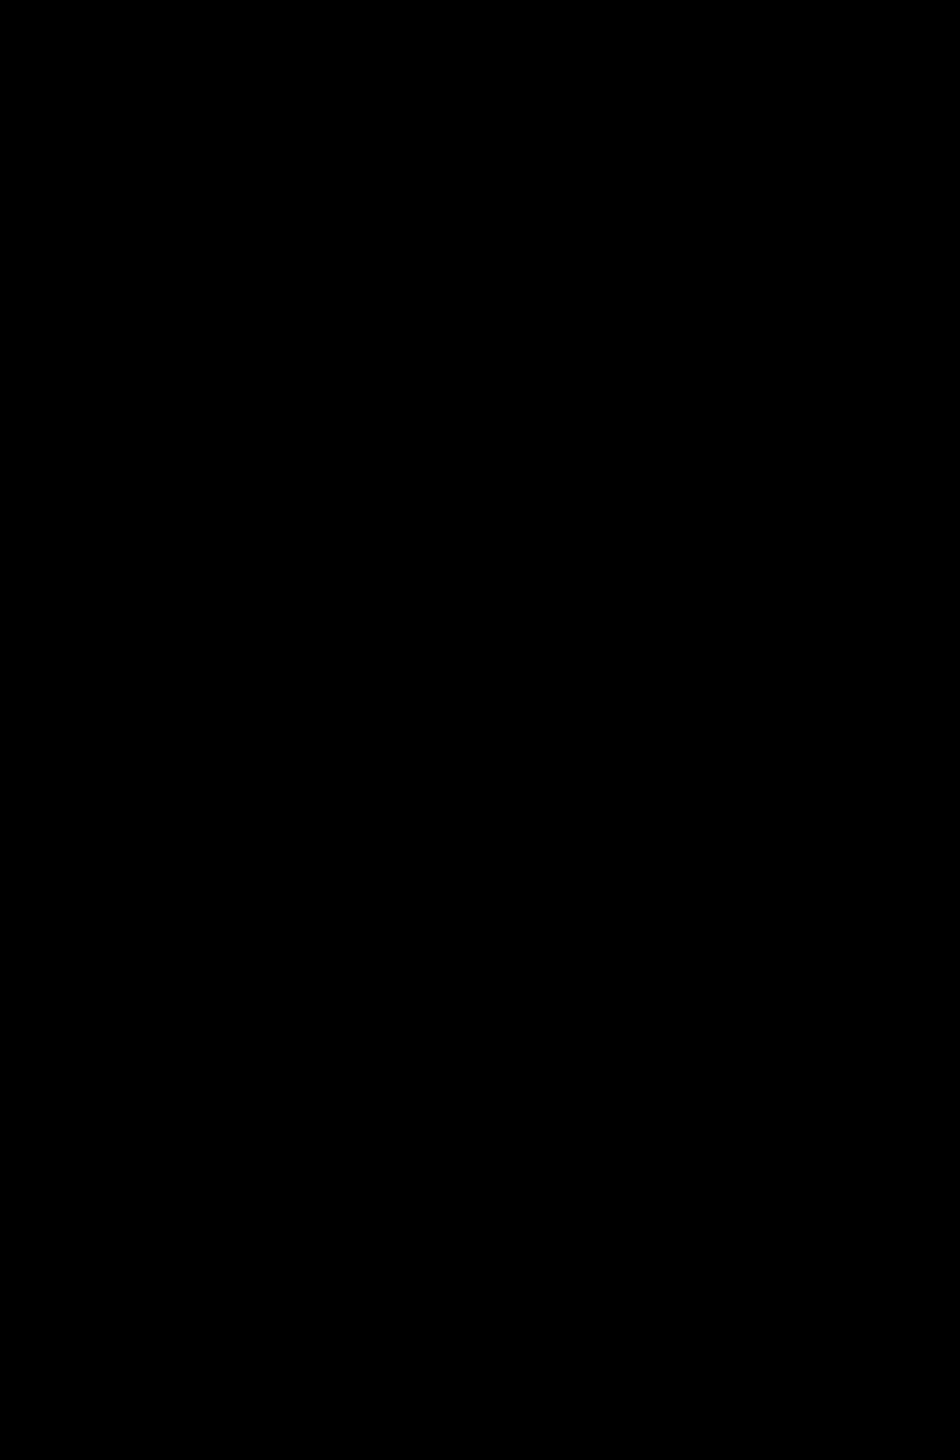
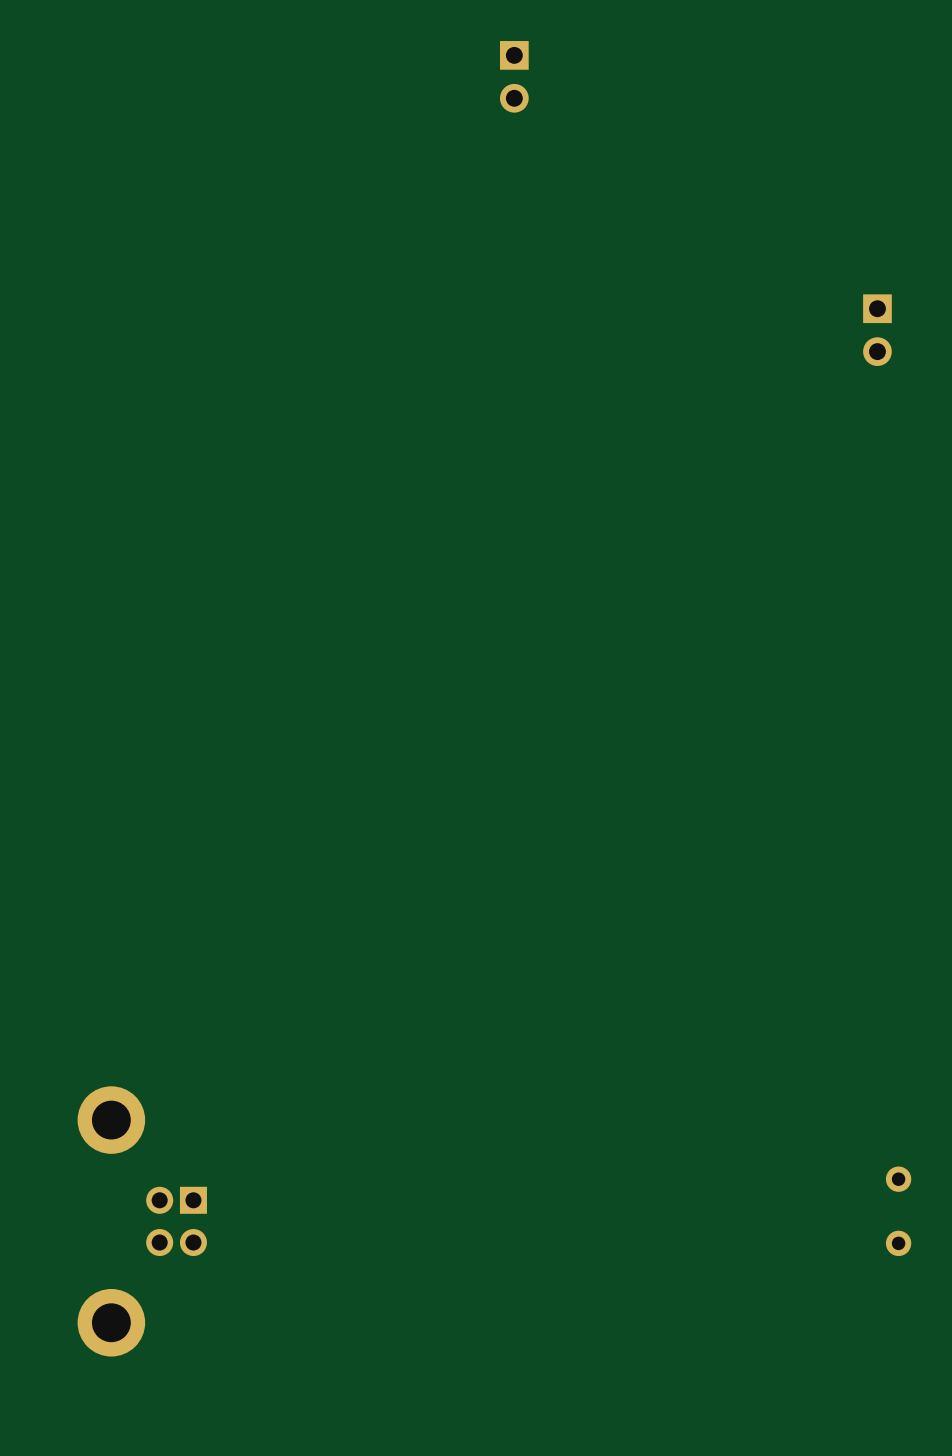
part: none -> (514, 76)
part: none -> (877, 330)
part: none -> (898, 1211)
part: none -> (142, 1221)

